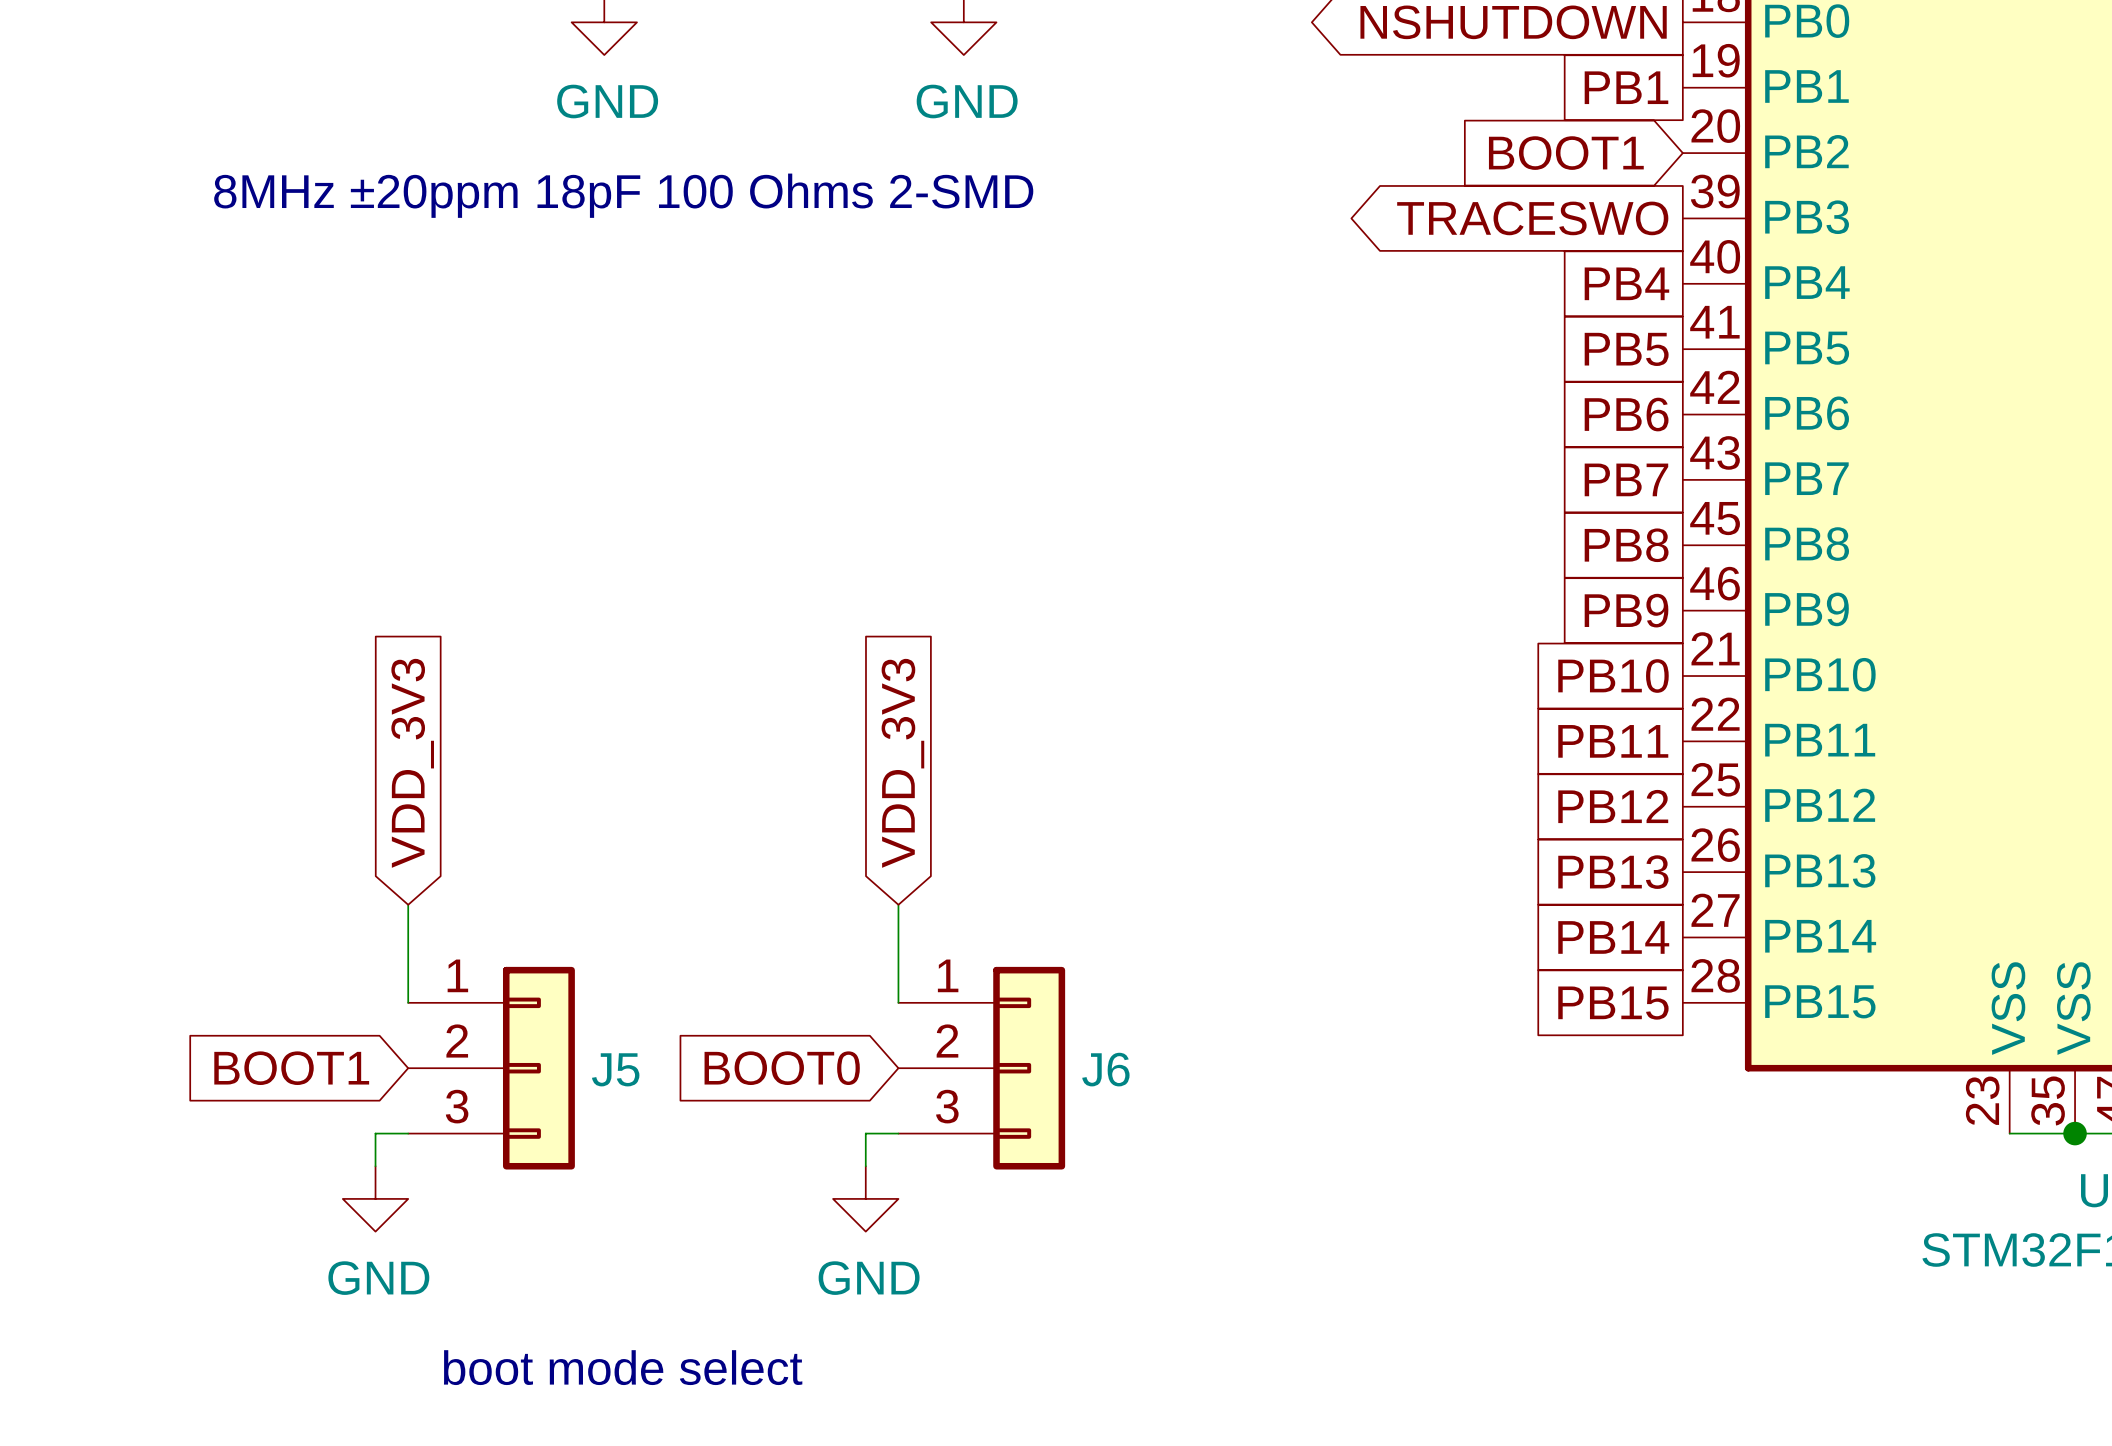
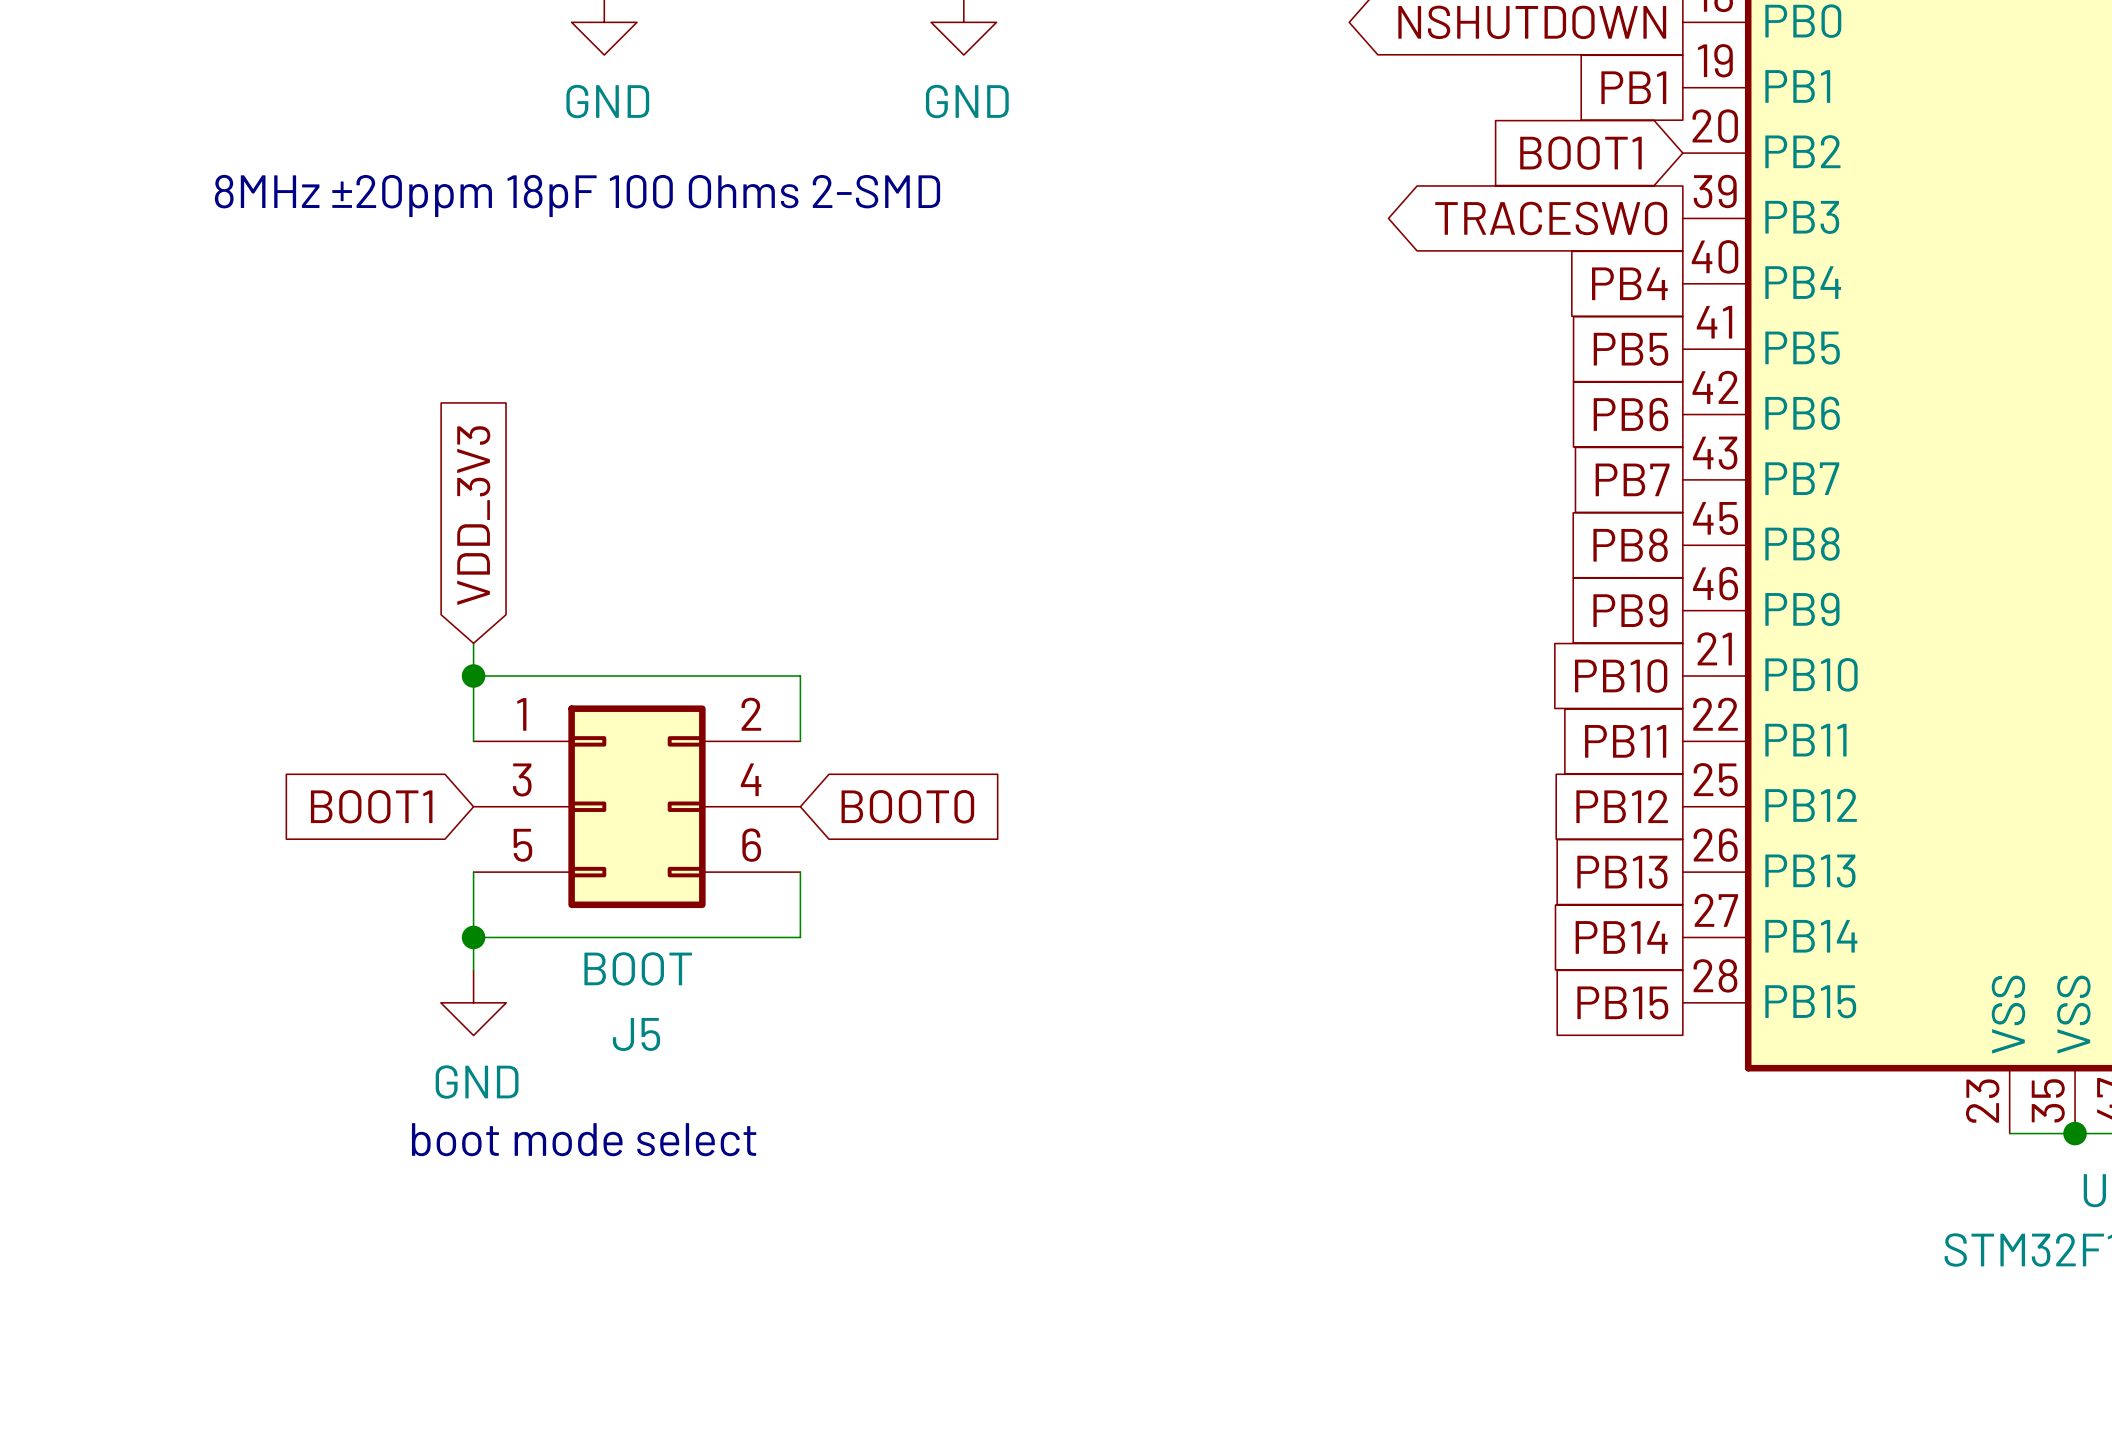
wire: none -> (473, 676) (800, 676) (800, 741)
junction: none -> (473, 676)
global label position: VDD_3V3 (412, 763) -> VDD_3V3 (473, 515)
global label: VDD_3V3 (902, 763) -> none
wire: none -> (800, 872) (800, 937) (473, 937)
wire: (408, 904) (408, 1002) -> (473, 872) (473, 970)
wire: (898, 904) (898, 1002) -> (473, 643) (473, 741)
junction: none -> (473, 937)
J5 symbol: [408, 966, 575, 1170] -> [473, 705, 801, 909]
J5 value: none -> BOOT (638, 968)
power symbol: none -> GND (473, 1002)
global label position: BOOT1 (291, 1068) -> BOOT1 (371, 806)
global label rotation: 0° (782, 1068) -> 180° (907, 806)
global label position: BOOT0 (782, 1068) -> BOOT0 (907, 806)
J6: (981, 1068) -> none
J5 name position: J5 (615, 1069) -> J5 (636, 1034)
wire: (408, 1133) (375, 1133) (375, 1166) -> none
wire: (898, 1133) (865, 1133) (865, 1166) -> none
power symbol: GND (375, 1198) -> none
power symbol: GND (865, 1198) -> none
text position: boot mode select (623, 1367) -> boot mode select (584, 1139)

